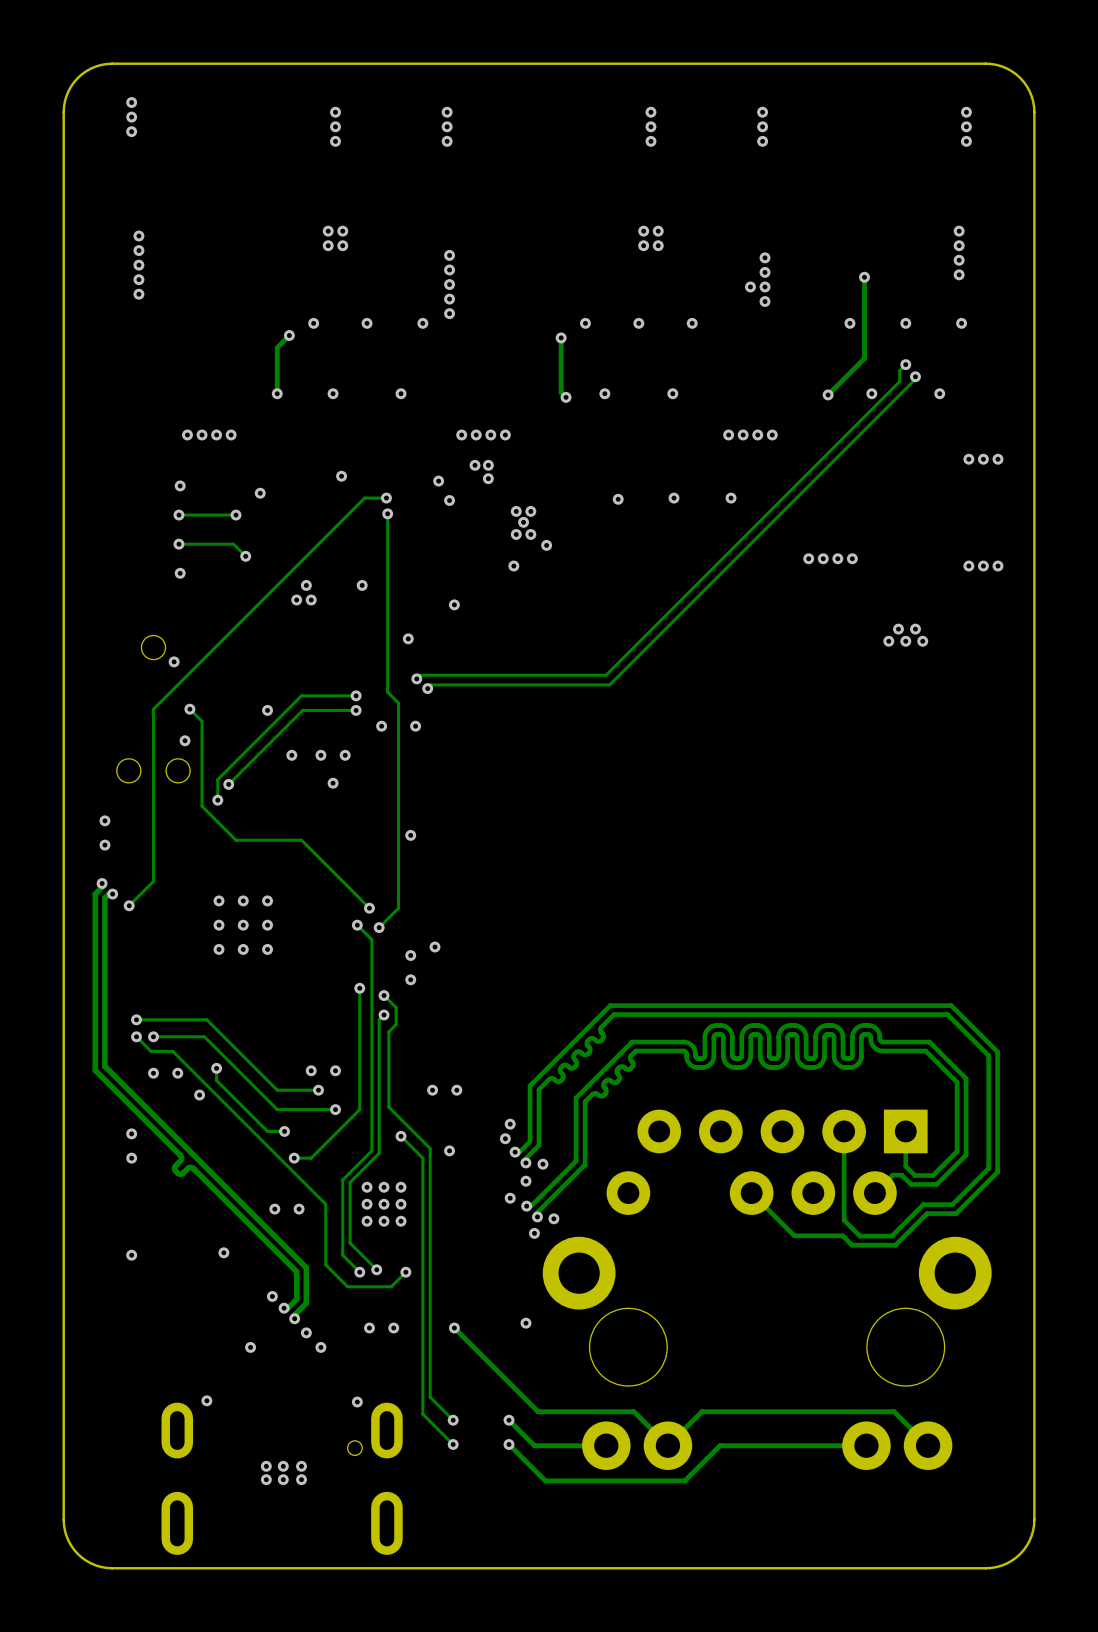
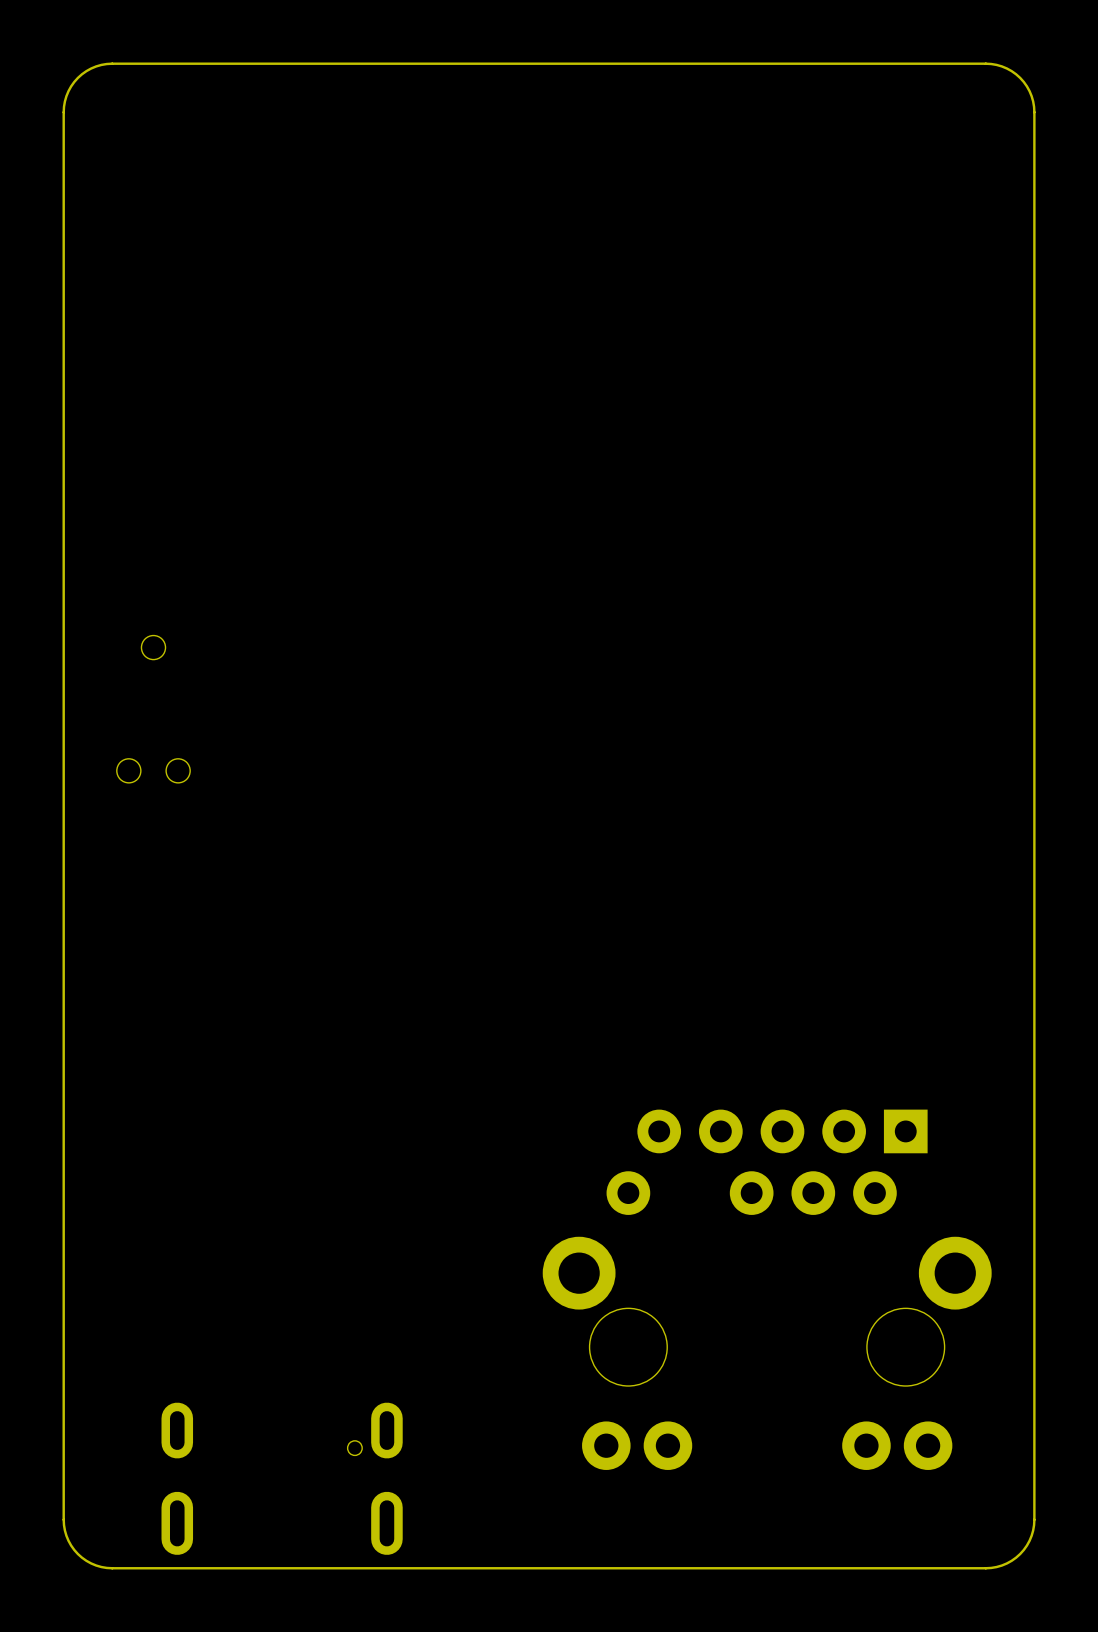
via: (131, 102) -> none
via: (335, 112) -> none
via: (447, 112) -> none
via: (650, 112) -> none
via: (762, 112) -> none
via: (966, 112) -> none
via: (131, 117) -> none
via: (335, 126) -> none
via: (447, 126) -> none
via: (650, 126) -> none
via: (762, 126) -> none
via: (966, 126) -> none
via: (131, 131) -> none
via: (335, 141) -> none
via: (447, 141) -> none
via: (650, 141) -> none
via: (762, 141) -> none
via: (966, 141) -> none
via: (328, 231) -> none
via: (342, 231) -> none
via: (643, 231) -> none
via: (658, 231) -> none
via: (959, 231) -> none
via: (138, 236) -> none
via: (328, 245) -> none
via: (342, 245) -> none
via: (643, 245) -> none
via: (658, 245) -> none
via: (959, 245) -> none
via: (138, 250) -> none
via: (449, 255) -> none
via: (765, 257) -> none
via: (959, 260) -> none
via: (138, 265) -> none
via: (449, 269) -> none
via: (765, 272) -> none
via: (959, 274) -> none
track: (864, 277) (864, 358) (828, 394) -> none
via: (864, 277) -> none
via: (138, 279) -> none
via: (449, 284) -> none
via: (750, 286) -> none
via: (765, 286) -> none
via: (138, 294) -> none
via: (449, 299) -> none
via: (765, 301) -> none
via: (449, 313) -> none
via: (313, 323) -> none
via: (367, 323) -> none
via: (422, 323) -> none
via: (585, 323) -> none
via: (638, 323) -> none
via: (692, 323) -> none
via: (849, 323) -> none
via: (905, 323) -> none
via: (961, 323) -> none
track: (289, 335) (277, 347) (277, 393) -> none
via: (289, 335) -> none
track: (561, 337) (561, 392) (566, 397) -> none
via: (561, 337) -> none
track: (905, 364) (899, 370) (899, 381) (606, 675) (420, 675) (416, 678) -> none
via: (905, 364) -> none
track: (915, 376) (915, 379) (609, 684) (431, 684) (427, 688) -> none
via: (915, 376) -> none
via: (277, 393) -> none
via: (333, 393) -> none
via: (401, 393) -> none
via: (604, 393) -> none
via: (672, 393) -> none
via: (871, 393) -> none
via: (939, 393) -> none
via: (828, 394) -> none
via: (566, 397) -> none
via: (187, 434) -> none
via: (202, 434) -> none
via: (216, 434) -> none
via: (231, 434) -> none
via: (461, 434) -> none
via: (476, 434) -> none
via: (490, 434) -> none
via: (505, 434) -> none
via: (728, 434) -> none
via: (743, 434) -> none
via: (757, 434) -> none
via: (772, 434) -> none
via: (968, 459) -> none
via: (983, 459) -> none
via: (997, 459) -> none
via: (475, 465) -> none
via: (488, 465) -> none
via: (341, 476) -> none
via: (488, 478) -> none
via: (438, 481) -> none
via: (180, 485) -> none
via: (260, 493) -> none
track: (386, 498) (364, 498) (153, 709) (153, 881) (129, 905) -> none
via: (386, 498) -> none
via: (674, 498) -> none
via: (731, 498) -> none
via: (618, 499) -> none
via: (449, 500) -> none
via: (516, 511) -> none
via: (530, 511) -> none
track: (387, 513) (387, 692) (398, 703) (398, 908) (379, 927) -> none
via: (387, 513) -> none
via: (178, 515) -> none
track: (236, 515) (178, 515) -> none
via: (236, 515) -> none
via: (523, 522) -> none
via: (516, 534) -> none
via: (530, 534) -> none
track: (178, 544) (233, 544) (245, 556) -> none
via: (178, 544) -> none
via: (546, 545) -> none
via: (245, 556) -> none
via: (808, 558) -> none
via: (823, 558) -> none
via: (837, 558) -> none
via: (852, 558) -> none
via: (513, 566) -> none
via: (968, 566) -> none
via: (983, 566) -> none
via: (997, 566) -> none
via: (180, 573) -> none
via: (306, 585) -> none
via: (362, 585) -> none
via: (296, 600) -> none
via: (311, 600) -> none
via: (454, 604) -> none
via: (898, 629) -> none
via: (915, 629) -> none
via: (408, 638) -> none
via: (888, 641) -> none
via: (905, 641) -> none
via: (922, 641) -> none
via: (174, 661) -> none
via: (416, 678) -> none
via: (427, 688) -> none
track: (356, 695) (301, 695) (217, 779) (217, 800) -> none
via: (356, 695) -> none
track: (189, 709) (202, 721) (202, 806) (236, 840) (301, 840) (369, 908) -> none
via: (189, 709) -> none
via: (267, 710) -> none
track: (356, 710) (302, 710) (228, 784) -> none
via: (356, 710) -> none
via: (381, 726) -> none
via: (415, 726) -> none
via: (185, 740) -> none
via: (291, 755) -> none
via: (320, 755) -> none
via: (345, 755) -> none
via: (333, 783) -> none
via: (228, 784) -> none
via: (217, 800) -> none
via: (104, 820) -> none
via: (410, 835) -> none
via: (104, 845) -> none
track: (102, 883) (102, 887) (95, 894) (95, 1070) (180, 1155) (181, 1160) (174, 1167) (177, 1172) (181, 1174) (188, 1167) (193, 1168) (296, 1271) (296, 1299) (287, 1308) (284, 1308) -> none
via: (102, 883) -> none
via: (112, 894) -> none
track: (111, 895) (108, 894) (104, 898) (104, 1066) (306, 1267) (306, 1303) (294, 1314) (294, 1318) -> none
via: (219, 900) -> none
via: (243, 900) -> none
via: (267, 900) -> none
via: (129, 905) -> none
via: (369, 908) -> none
via: (219, 925) -> none
via: (243, 925) -> none
via: (267, 925) -> none
track: (357, 925) (371, 939) (371, 1150) (342, 1179) (342, 1255) (359, 1272) -> none
via: (357, 925) -> none
via: (379, 927) -> none
via: (434, 947) -> none
via: (219, 949) -> none
via: (243, 949) -> none
via: (267, 949) -> none
via: (410, 955) -> none
via: (410, 979) -> none
track: (359, 988) (359, 1109) (311, 1158) (294, 1158) -> none
via: (359, 988) -> none
track: (384, 995) (396, 1007) (396, 1024) (388, 1031) (388, 1107) (430, 1148) (430, 1397) (453, 1420) -> none
via: (384, 995) -> none
track: (384, 1014) (379, 1019) (379, 1153) (350, 1182) (350, 1243) (376, 1269) -> none
via: (384, 1014) -> none
track: (136, 1019) (206, 1019) (277, 1090) (318, 1090) -> none
via: (136, 1019) -> none
track: (136, 1036) (151, 1051) (172, 1051) (325, 1204) (325, 1264) (347, 1286) (391, 1286) (405, 1272) -> none
via: (136, 1036) -> none
track: (153, 1036) (204, 1036) (277, 1109) (335, 1109) -> none
via: (153, 1036) -> none
track: (216, 1068) (216, 1080) (267, 1131) (284, 1131) -> none
via: (216, 1068) -> none
via: (311, 1070) -> none
via: (335, 1070) -> none
via: (153, 1073) -> none
via: (177, 1073) -> none
via: (318, 1090) -> none
via: (432, 1090) -> none
via: (456, 1090) -> none
via: (199, 1095) -> none
via: (335, 1109) -> none
via: (510, 1124) -> none
via: (284, 1131) -> none
track: (844, 1131) (844, 1220) (860, 1236) (891, 1236) (923, 1204) (952, 1204) (988, 1168) (988, 1055) (947, 1014) (613, 1014) (600, 1028) (603, 1035) (602, 1039) (598, 1041) (591, 1038) (587, 1041) (590, 1049) (589, 1052) (585, 1055) (579, 1051) (576, 1052) (573, 1056) (576, 1062) (575, 1065) (571, 1068) (564, 1064) (560, 1068) (563, 1076) (561, 1080) (557, 1081) (550, 1078) (538, 1089) (538, 1145) (525, 1158) (525, 1162) -> none
track: (905, 1131) (905, 1166) (914, 1175) (933, 1175) (957, 1151) (957, 1082) (925, 1051) (879, 1050) (873, 1046) (870, 1036) (868, 1034) (861, 1036) (859, 1061) (851, 1067) (841, 1066) (835, 1061) (834, 1036) (831, 1034) (824, 1036) (824, 1058) (821, 1064) (814, 1067) (804, 1066) (798, 1061) (797, 1036) (794, 1034) (787, 1036) (787, 1058) (783, 1065) (777, 1067) (767, 1066) (761, 1061) (760, 1036) (757, 1034) (751, 1036) (750, 1058) (747, 1064) (740, 1067) (730, 1066) (724, 1061) (723, 1036) (720, 1034) (714, 1036) (713, 1058) (709, 1065) (703, 1067) (691, 1065) (684, 1051) (635, 1051) (630, 1057) (633, 1063) (632, 1067) (628, 1069) (619, 1067) (616, 1071) (619, 1076) (618, 1080) (614, 1082) (608, 1079) (604, 1082) (606, 1091) (604, 1095) (600, 1096) (593, 1093) (585, 1101) (585, 1164) (537, 1212) (537, 1216) -> none
via: (131, 1133) -> none
track: (401, 1136) (422, 1158) (422, 1414) (453, 1444) -> none
via: (401, 1136) -> none
via: (505, 1138) -> none
via: (449, 1150) -> none
track: (515, 1152) (519, 1152) (529, 1141) (529, 1085) (610, 1005) (951, 1005) (997, 1051) (997, 1172) (956, 1213) (927, 1213) (895, 1245) (852, 1245) (842, 1235) (794, 1235) (751, 1193) -> none
via: (515, 1152) -> none
via: (131, 1158) -> none
via: (294, 1158) -> none
via: (525, 1162) -> none
via: (542, 1164) -> none
via: (525, 1181) -> none
via: (367, 1187) -> none
via: (384, 1187) -> none
via: (401, 1187) -> none
track: (874, 1193) (892, 1175) (901, 1175) (911, 1184) (936, 1184) (966, 1155) (966, 1078) (929, 1042) (882, 1041) (877, 1030) (871, 1025) (861, 1025) (854, 1031) (852, 1056) (849, 1058) (843, 1056) (842, 1034) (837, 1026) (825, 1025) (819, 1028) (815, 1035) (815, 1056) (809, 1058) (806, 1056) (804, 1031) (797, 1025) (787, 1025) (782, 1028) (779, 1034) (778, 1057) (772, 1058) (769, 1056) (767, 1031) (760, 1025) (750, 1025) (745, 1028) (742, 1034) (741, 1057) (735, 1058) (732, 1056) (730, 1031) (725, 1026) (716, 1025) (709, 1027) (705, 1032) (704, 1056) (702, 1058) (696, 1057) (693, 1047) (686, 1042) (632, 1042) (576, 1098) (576, 1161) (531, 1206) (526, 1206) -> none
via: (510, 1198) -> none
via: (367, 1204) -> none
via: (384, 1204) -> none
via: (401, 1204) -> none
via: (526, 1206) -> none
via: (274, 1209) -> none
via: (299, 1209) -> none
via: (537, 1216) -> none
via: (553, 1218) -> none
via: (367, 1221) -> none
via: (384, 1221) -> none
via: (401, 1221) -> none
via: (534, 1233) -> none
via: (223, 1252) -> none
via: (131, 1255) -> none
via: (376, 1269) -> none
via: (359, 1272) -> none
via: (405, 1272) -> none
via: (272, 1296) -> none
via: (284, 1308) -> none
via: (294, 1318) -> none
via: (525, 1323) -> none
via: (369, 1328) -> none
via: (393, 1328) -> none
track: (454, 1328) (538, 1411) (633, 1411) (667, 1445) (701, 1411) (894, 1411) (928, 1445) -> none
via: (454, 1328) -> none
via: (306, 1332) -> none
via: (250, 1347) -> none
via: (320, 1347) -> none
via: (206, 1400) -> none
via: (357, 1402) -> none
via: (453, 1420) -> none
track: (509, 1420) (534, 1445) (606, 1445) -> none
via: (509, 1420) -> none
via: (453, 1444) -> none
track: (509, 1444) (545, 1480) (684, 1480) (720, 1445) (866, 1445) -> none
via: (509, 1444) -> none
via: (266, 1466) -> none
via: (283, 1466) -> none
via: (301, 1466) -> none
via: (266, 1479) -> none
via: (283, 1479) -> none
via: (301, 1479) -> none

